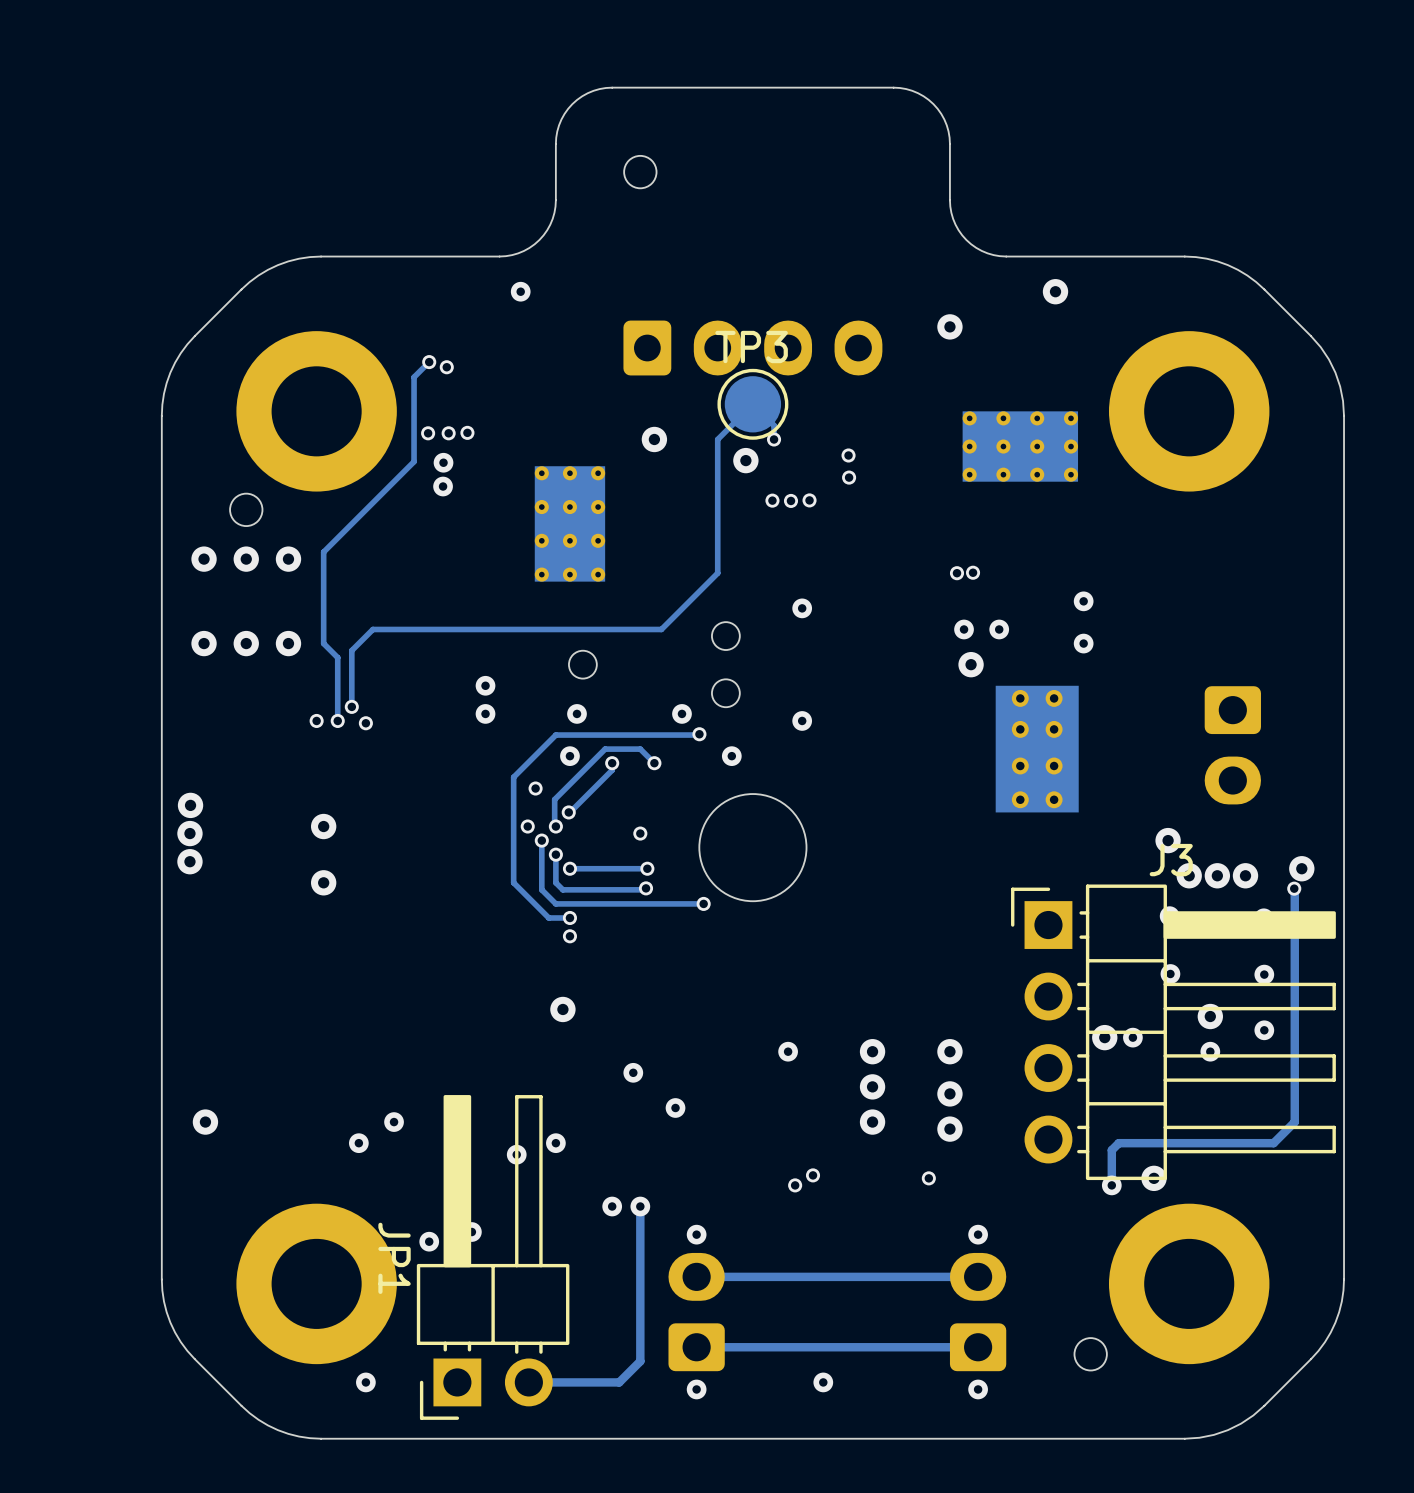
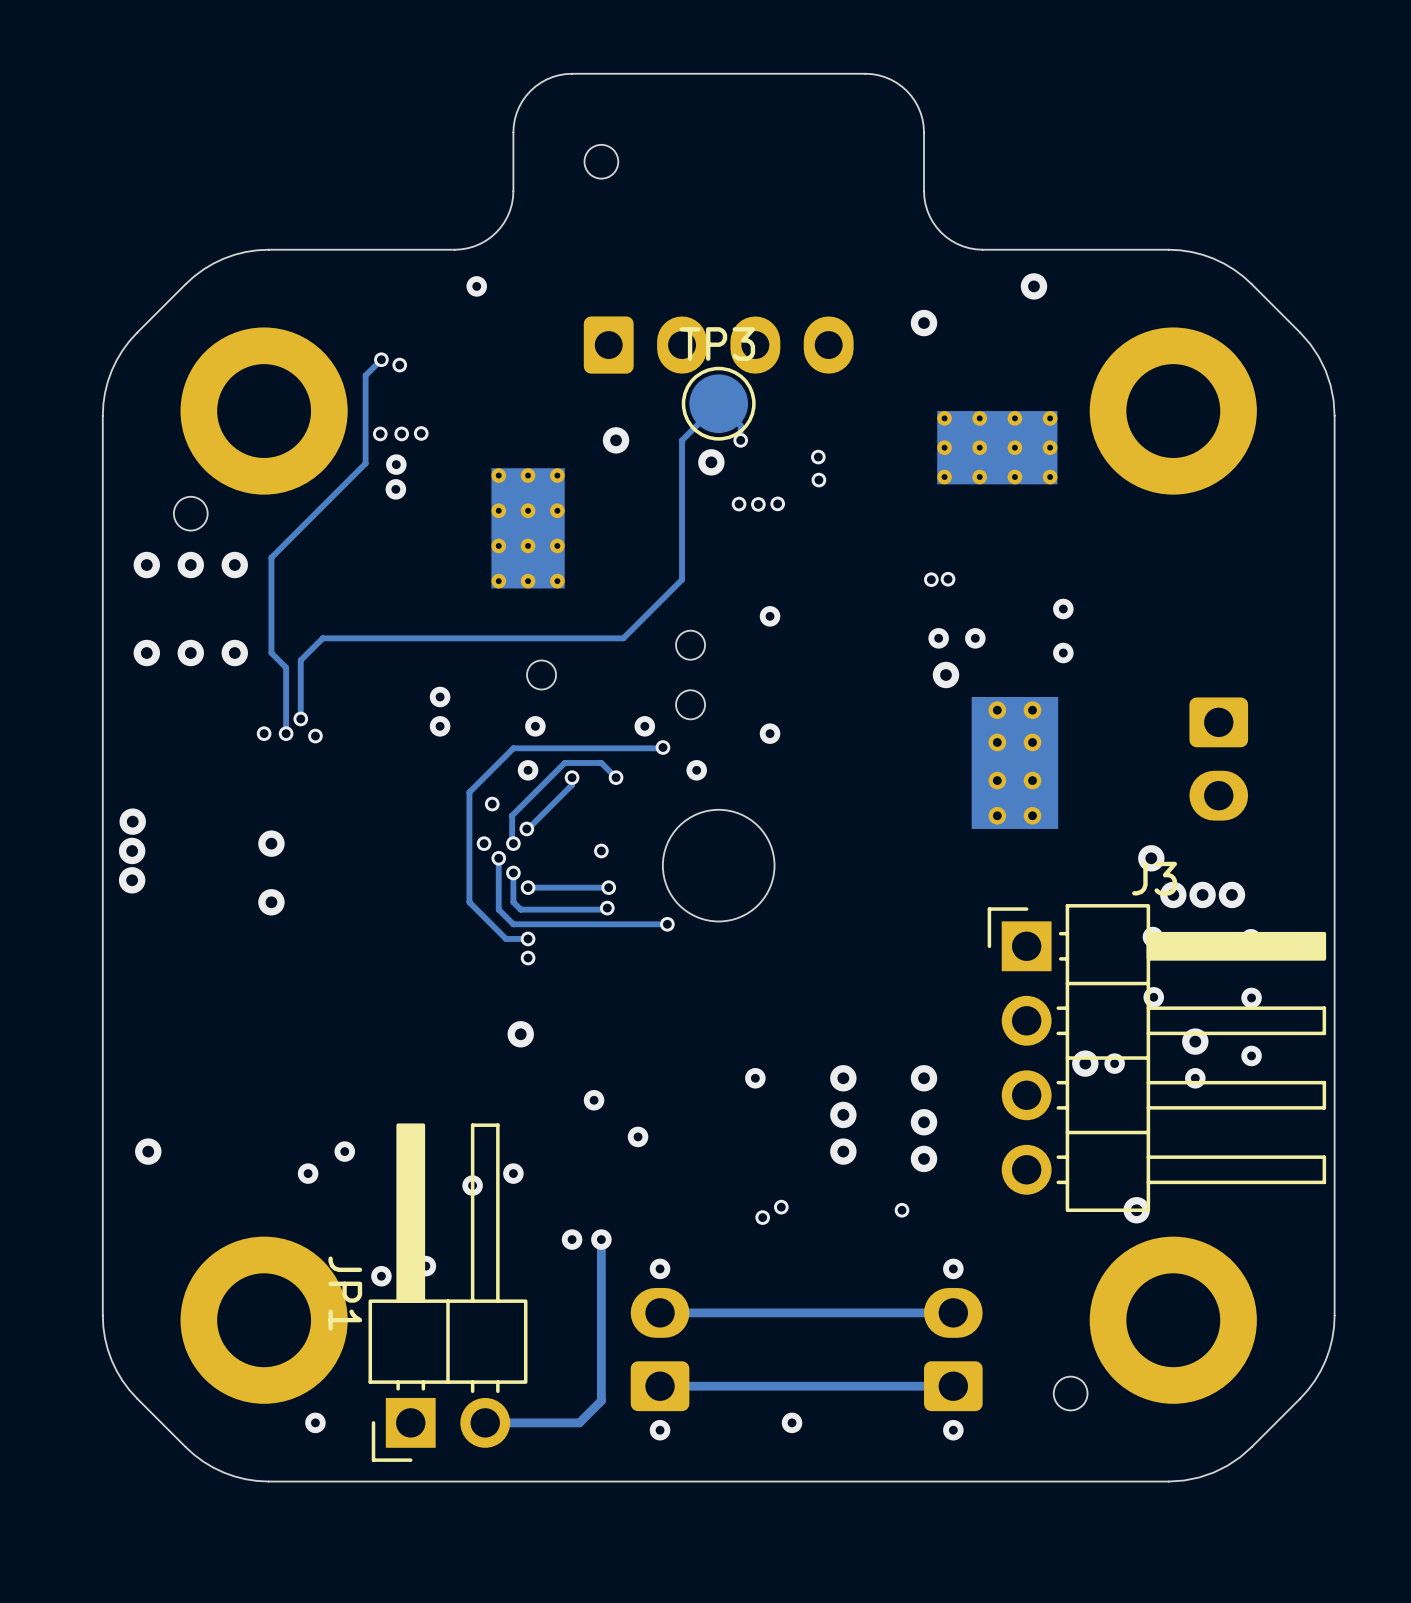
via: (1301, 868) -> none
track: (1294, 888) (1294, 1122) (1273, 1143) (1118, 1143) (1111, 1150) (1111, 1185) -> none
via: (1294, 888) -> none
via: (1111, 1185) -> none

